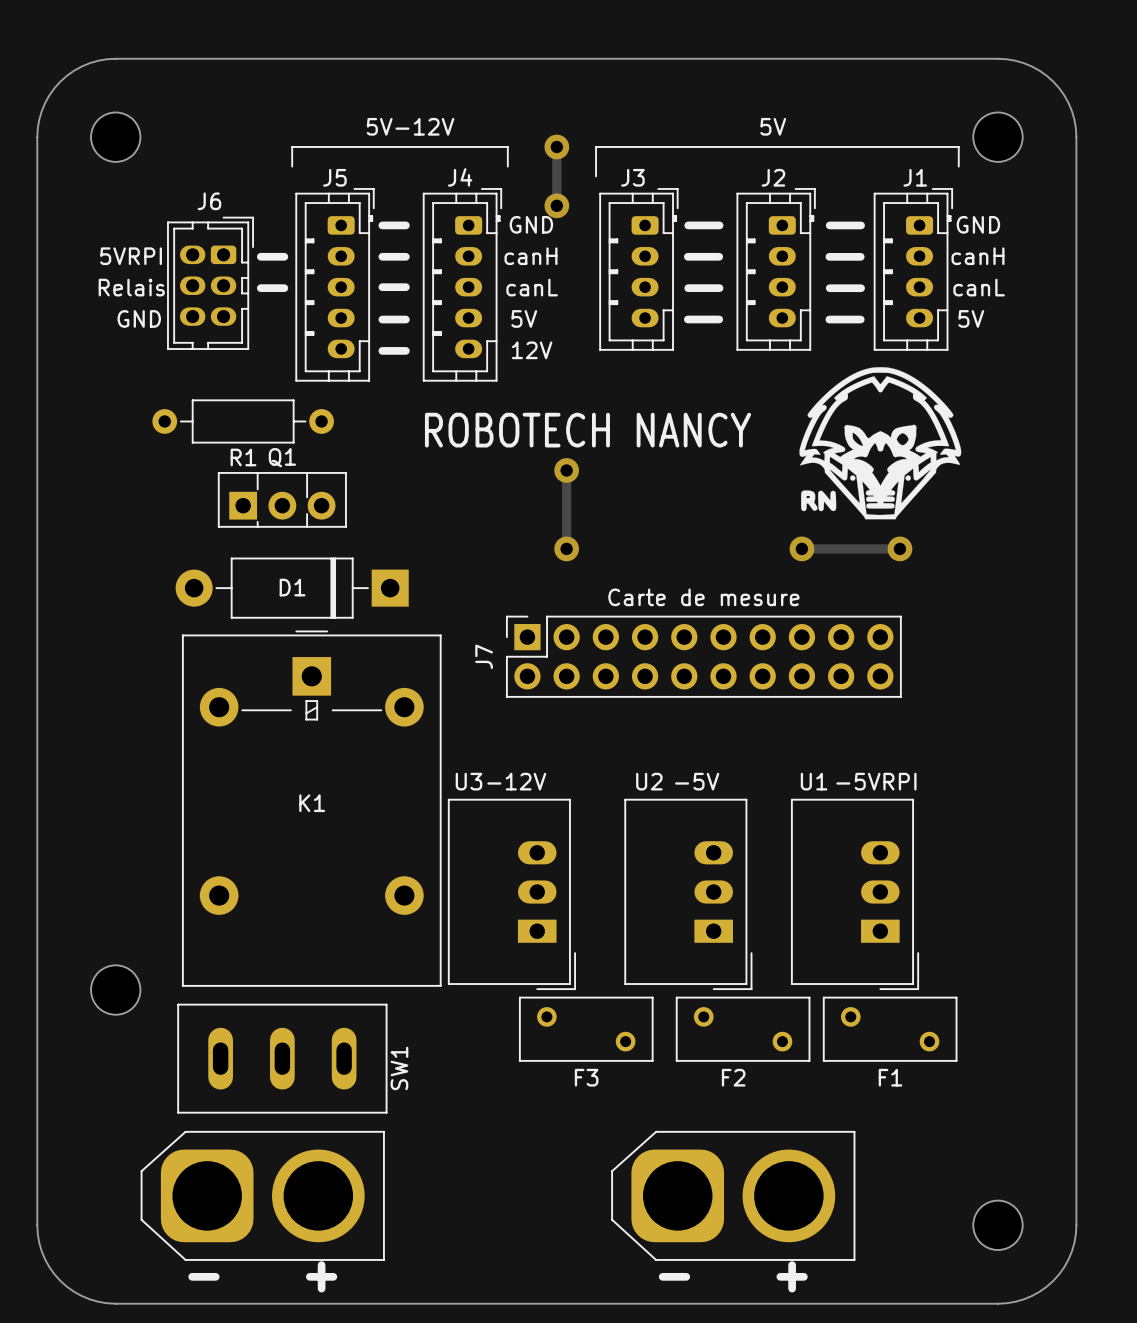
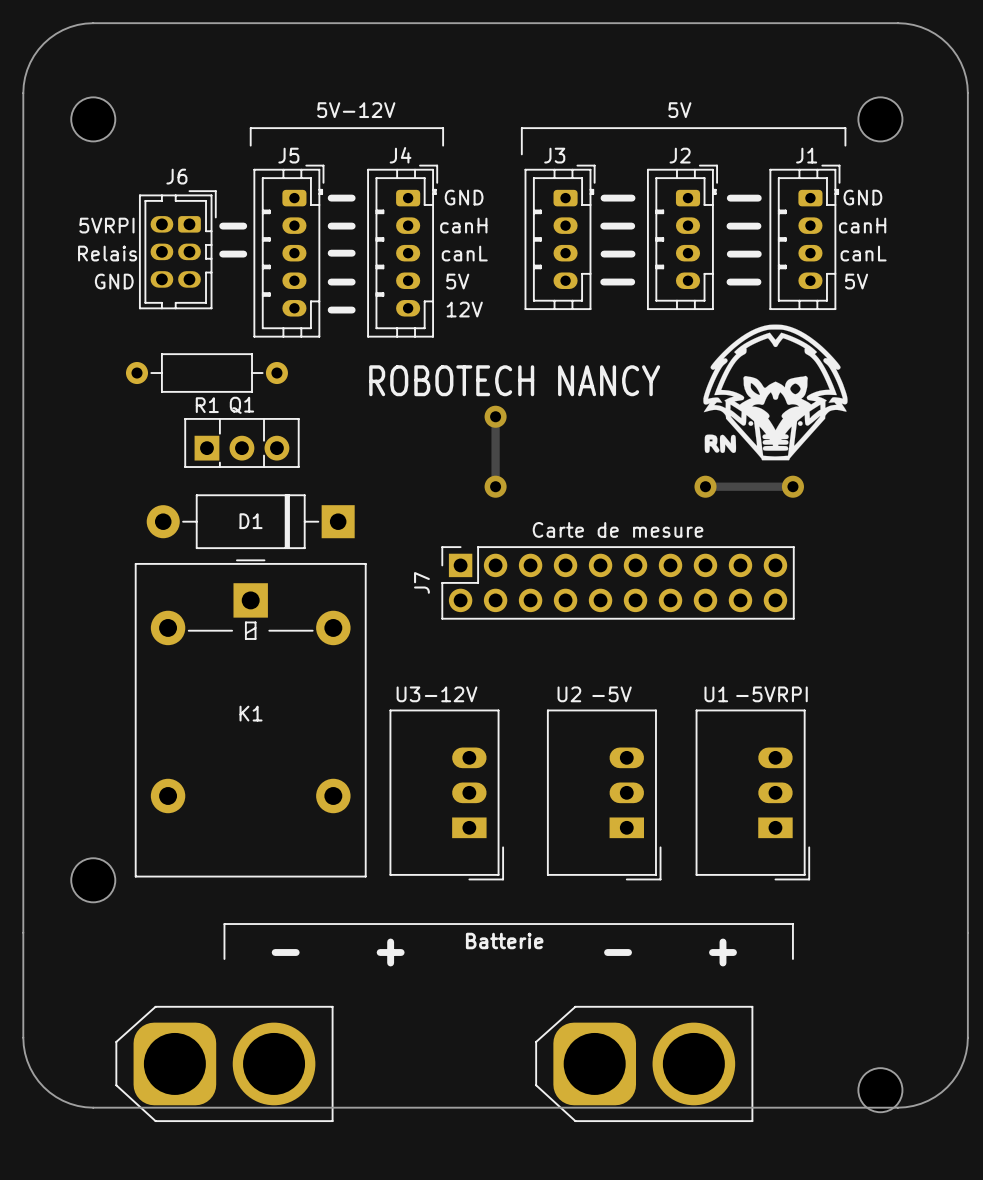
board edge: (37, 137) (41, 111) (49, 95) (60, 81) (74, 70) (89, 63) (115, 58) (997, 58) (1023, 63) (1039, 70) (1053, 81) (1064, 95) (1072, 111) (1076, 137) (1075, 1234) (1068, 1259) (1053, 1280) (1032, 1295) (1006, 1303) (106, 1303) (89, 1299) (74, 1291) (54, 1274) (45, 1259) (37, 1234) (37, 1166) -> (23, 119) (25, 77) (30, 62) (38, 49) (49, 38) (62, 30) (77, 24) (93, 23) (905, 23) (928, 30) (947, 43) (960, 62) (966, 77) (967, 93) (967, 1037) (966, 1053) (960, 1068) (947, 1087) (935, 1096) (921, 1103) (897, 1107) (93, 1107) (77, 1105) (62, 1100) (43, 1087) (30, 1068) (25, 1053) (23, 1037)
track: (556, 146) (556, 205) -> none
via: (556, 146) -> none
via: (556, 205) -> none
K1 position: (311, 808) -> (250, 718)
F3: (586, 1029) -> none
F2: (743, 1029) -> none
F1: (890, 1029) -> none
SW1: (282, 1058) -> none
text: none -> Batterie (504, 940)
text: none -> - (285, 952)
text: none -> + (390, 952)
text: none -> - (618, 952)
text: none -> + (722, 952)
line: none -> (224, 959) (224, 924) (792, 924) (792, 959)
text: - (203, 1276) -> none
text: + (321, 1276) -> none
text: - (674, 1276) -> none
text: + (792, 1276) -> none

